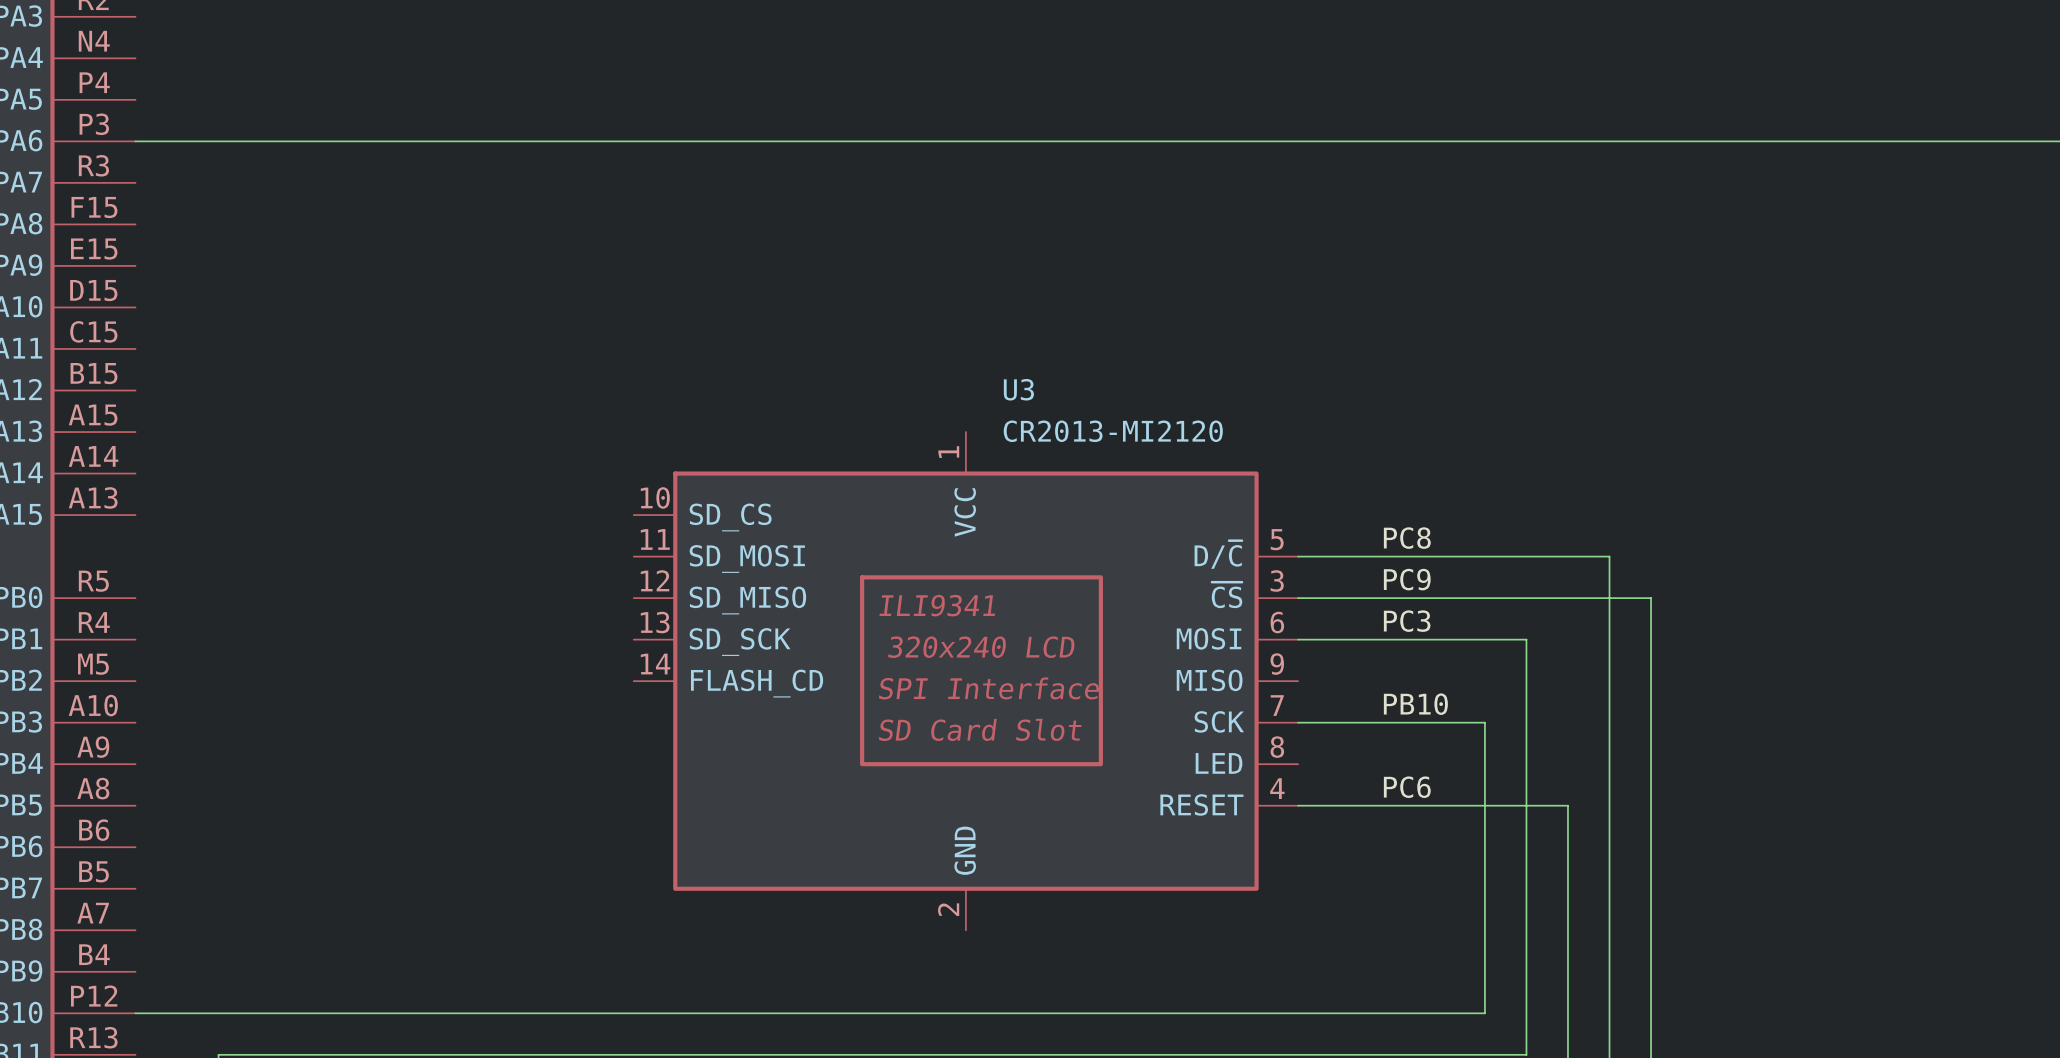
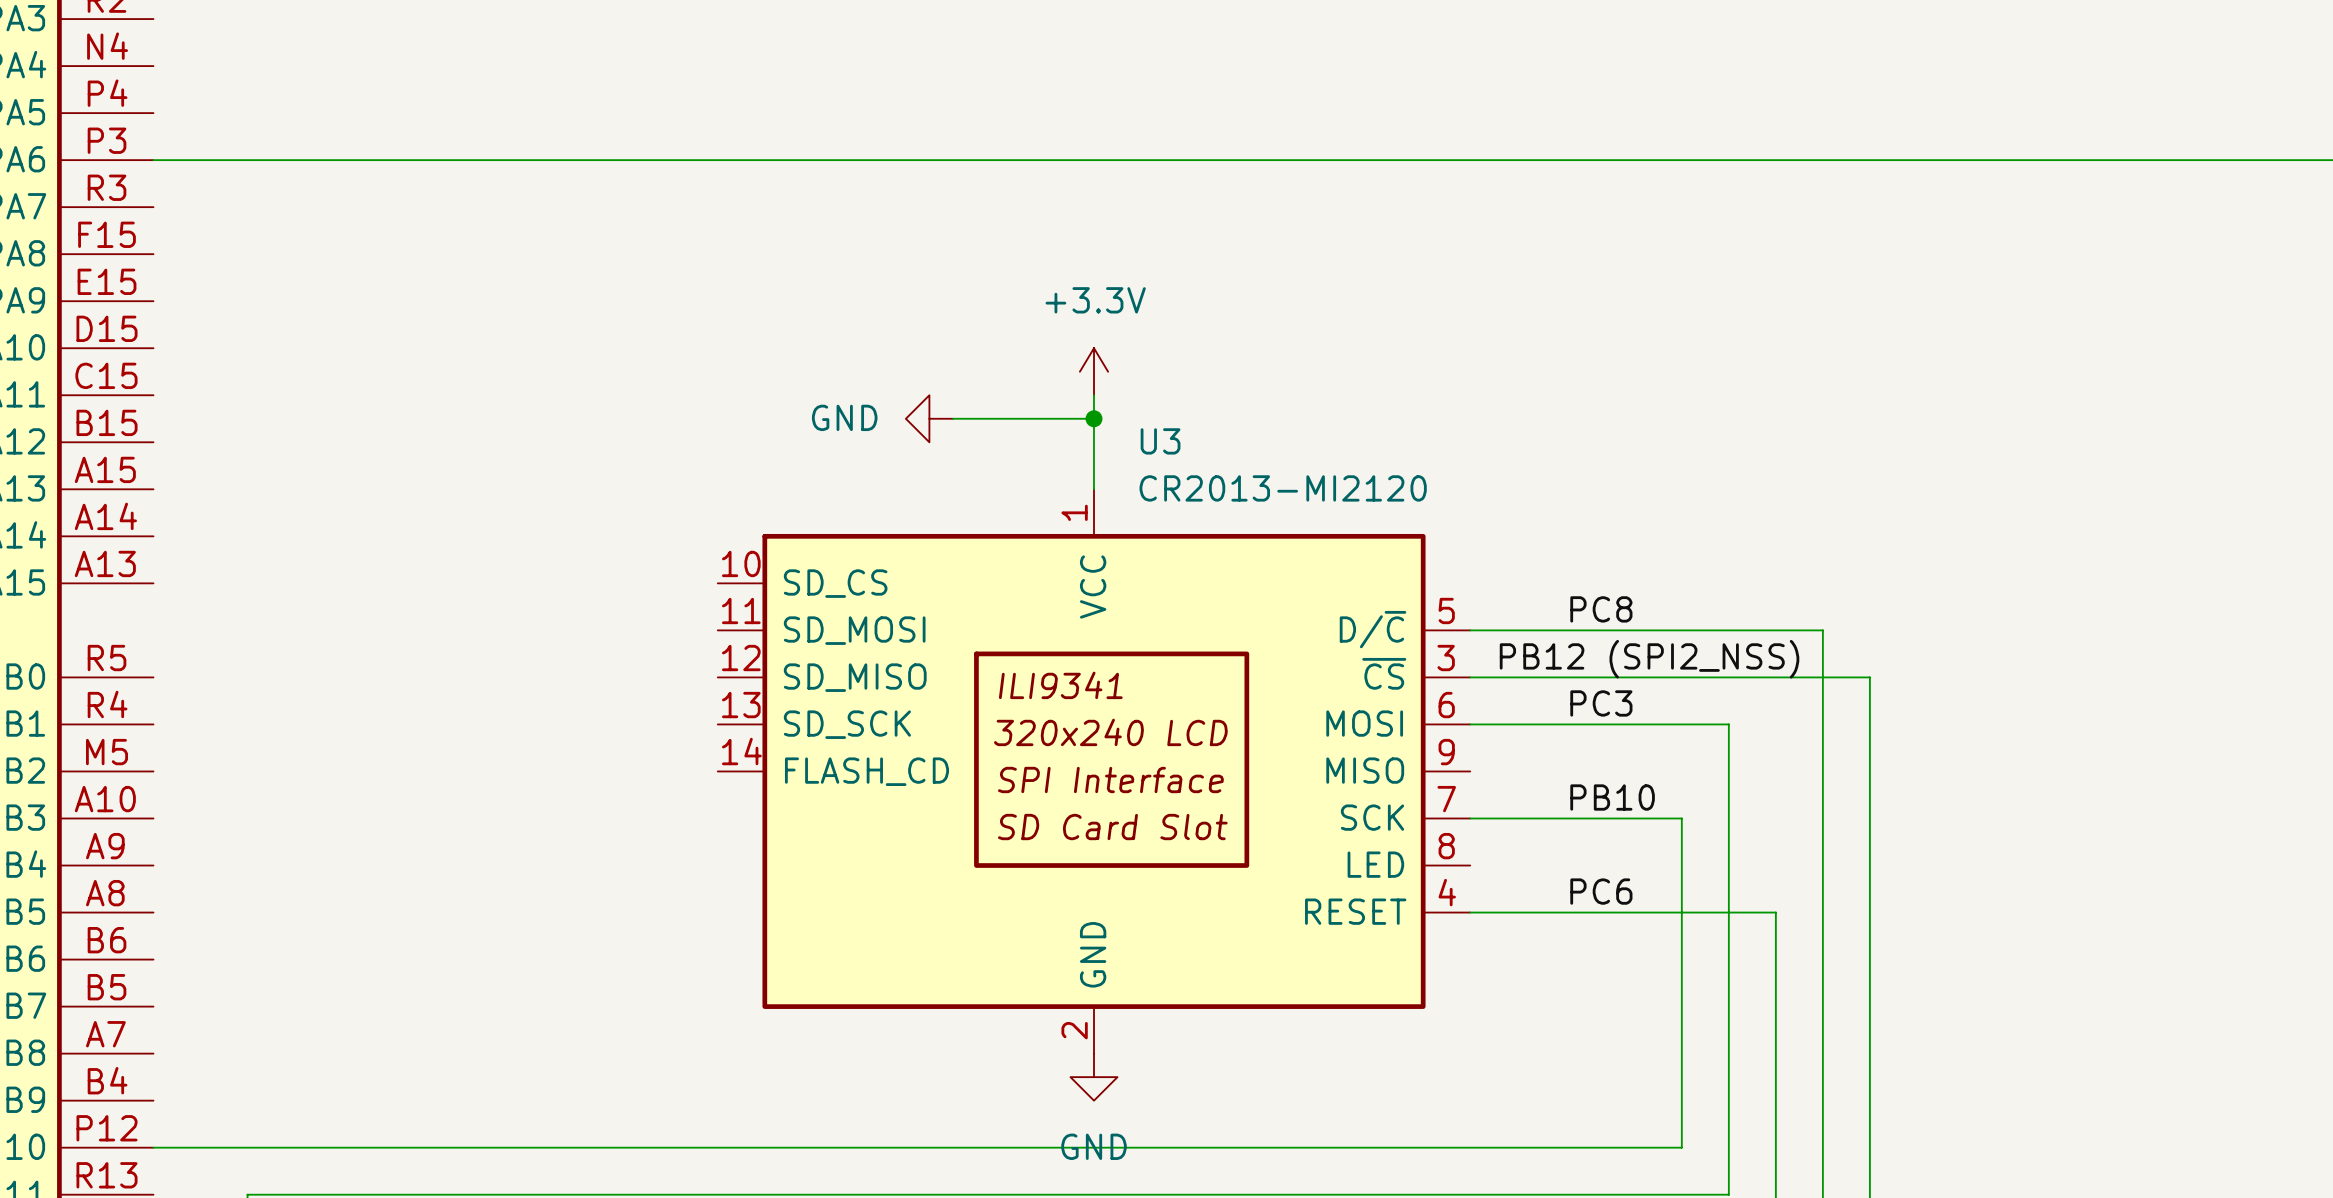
power symbol: none -> +3.3V (1094, 371)
wire: none -> (1094, 395) (1094, 489)
power symbol: none -> GND (929, 418)
wire: none -> (952, 418) (1094, 418)
junction: none -> (1094, 418)
label: PC9 (1407, 579) -> none
label: none -> PB12 (SPI2_NSS) (1649, 659)
power symbol: none -> GND (1094, 1077)

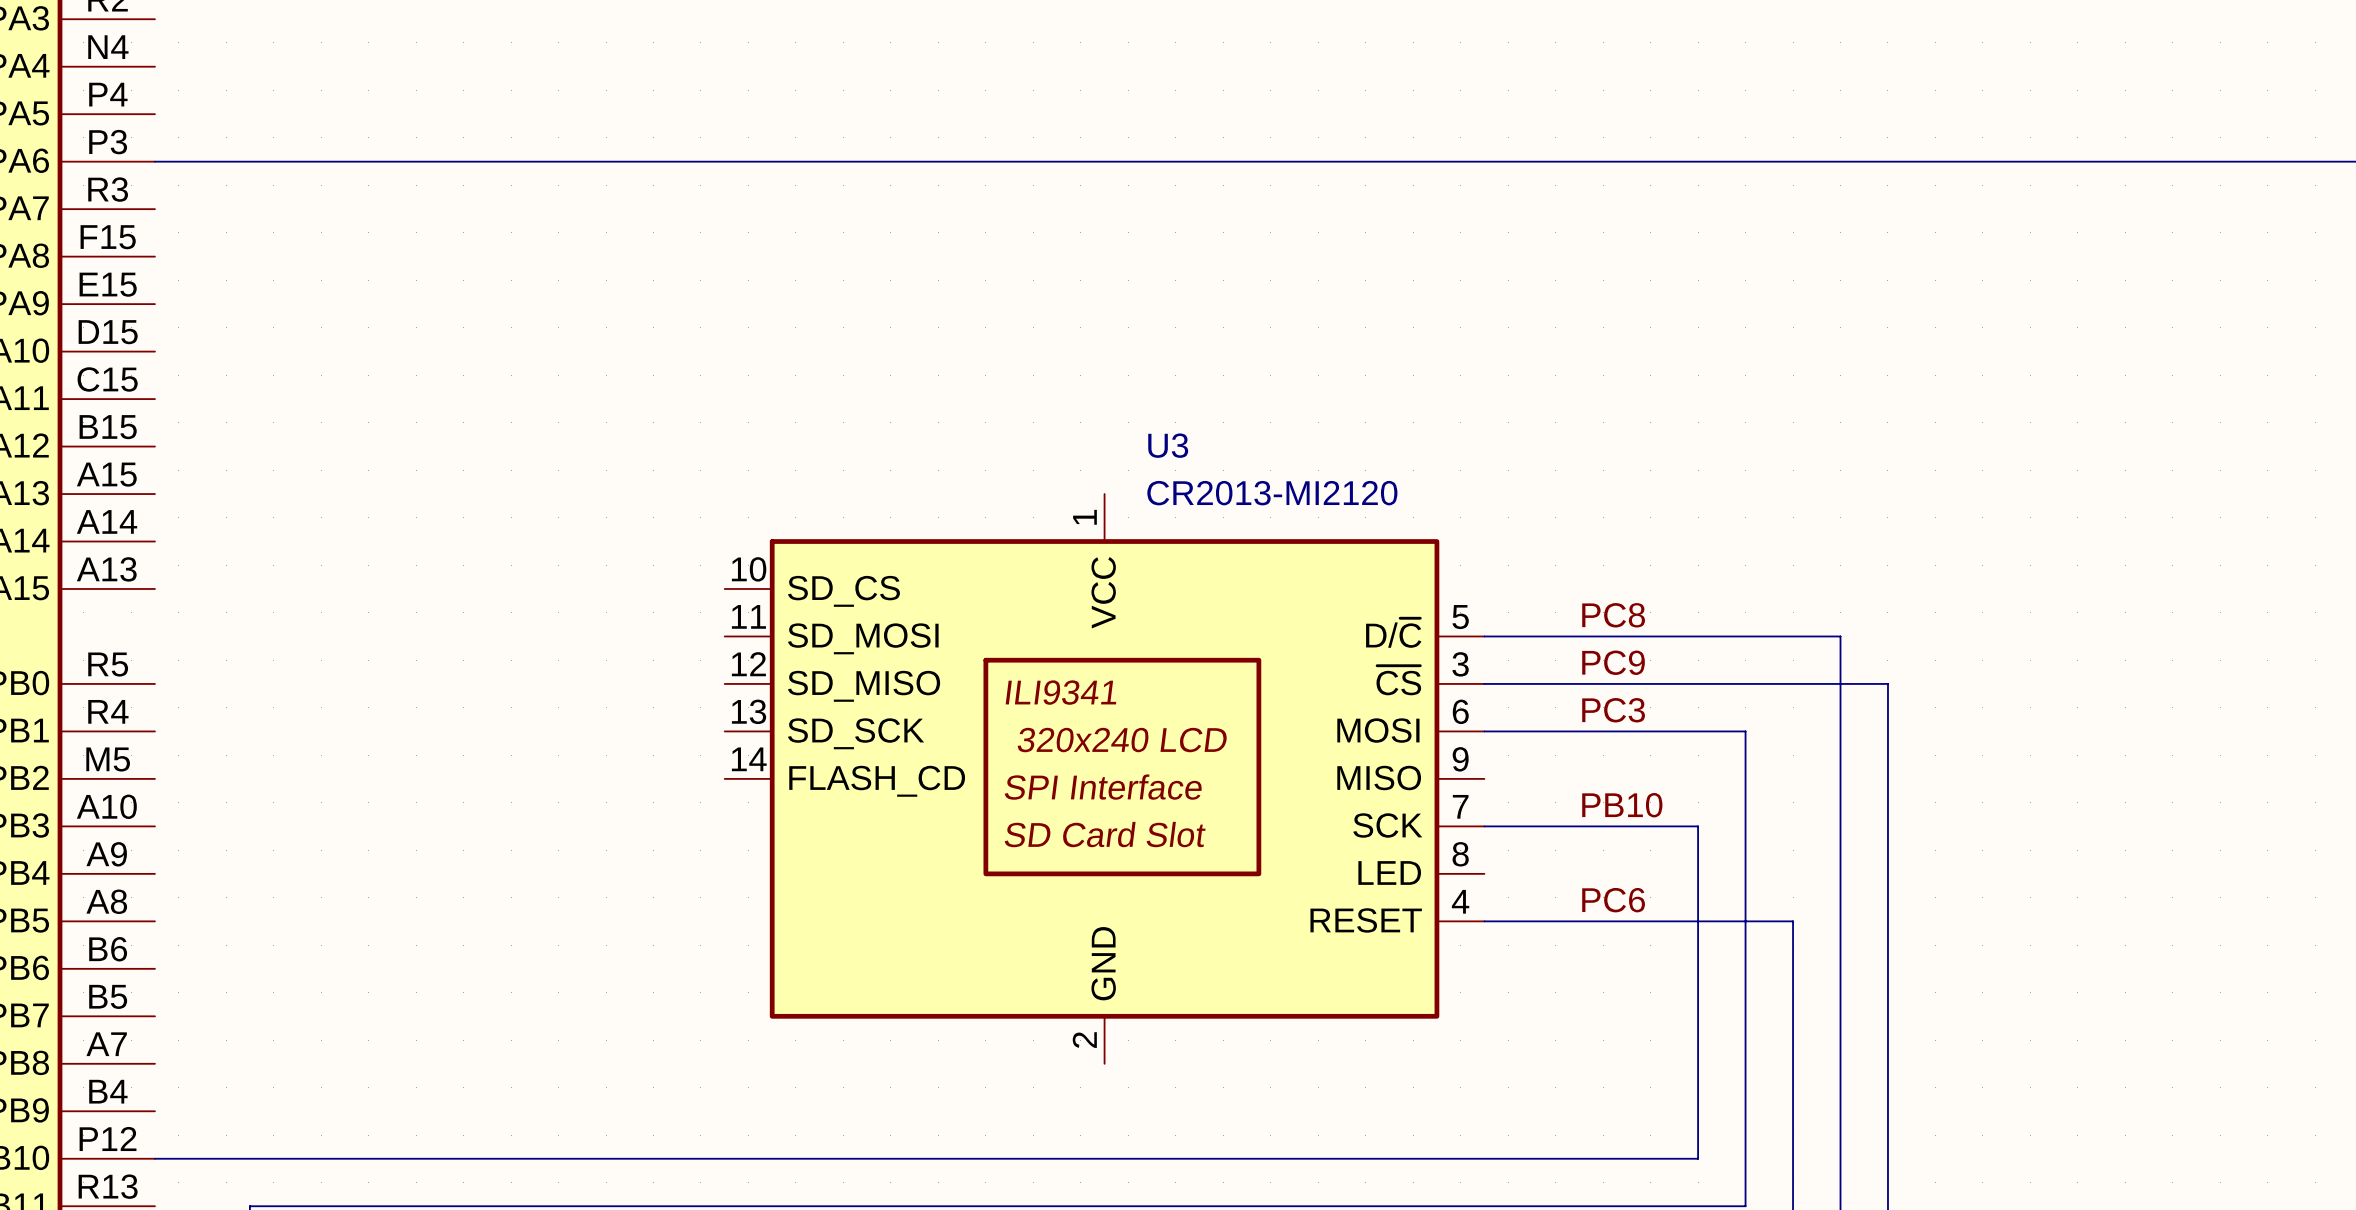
power symbol: +3.3V (1094, 371) -> none
wire: (1094, 395) (1094, 489) -> none
power symbol: GND (929, 418) -> none
wire: (952, 418) (1094, 418) -> none
junction: (1094, 418) -> none
label: none -> PC9 (1613, 662)
label: PB12 (SPI2_NSS) (1649, 659) -> none
power symbol: GND (1094, 1077) -> none

